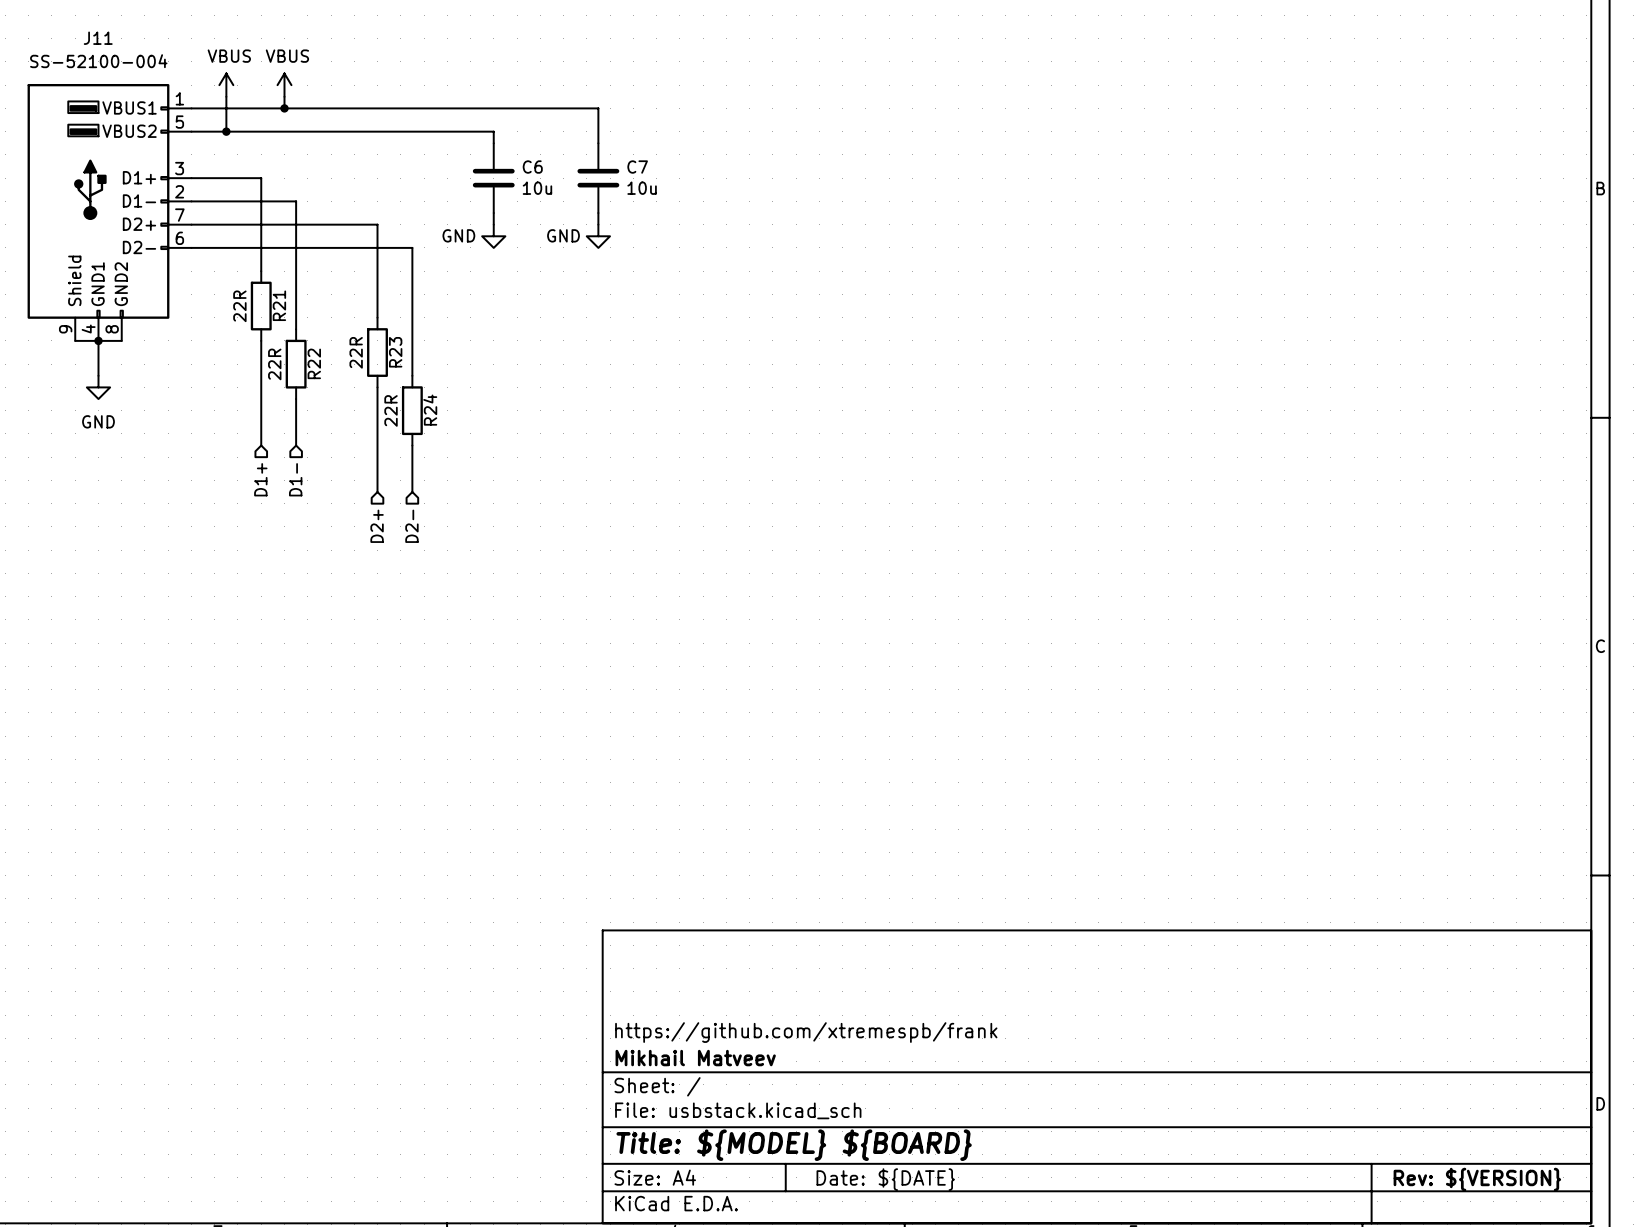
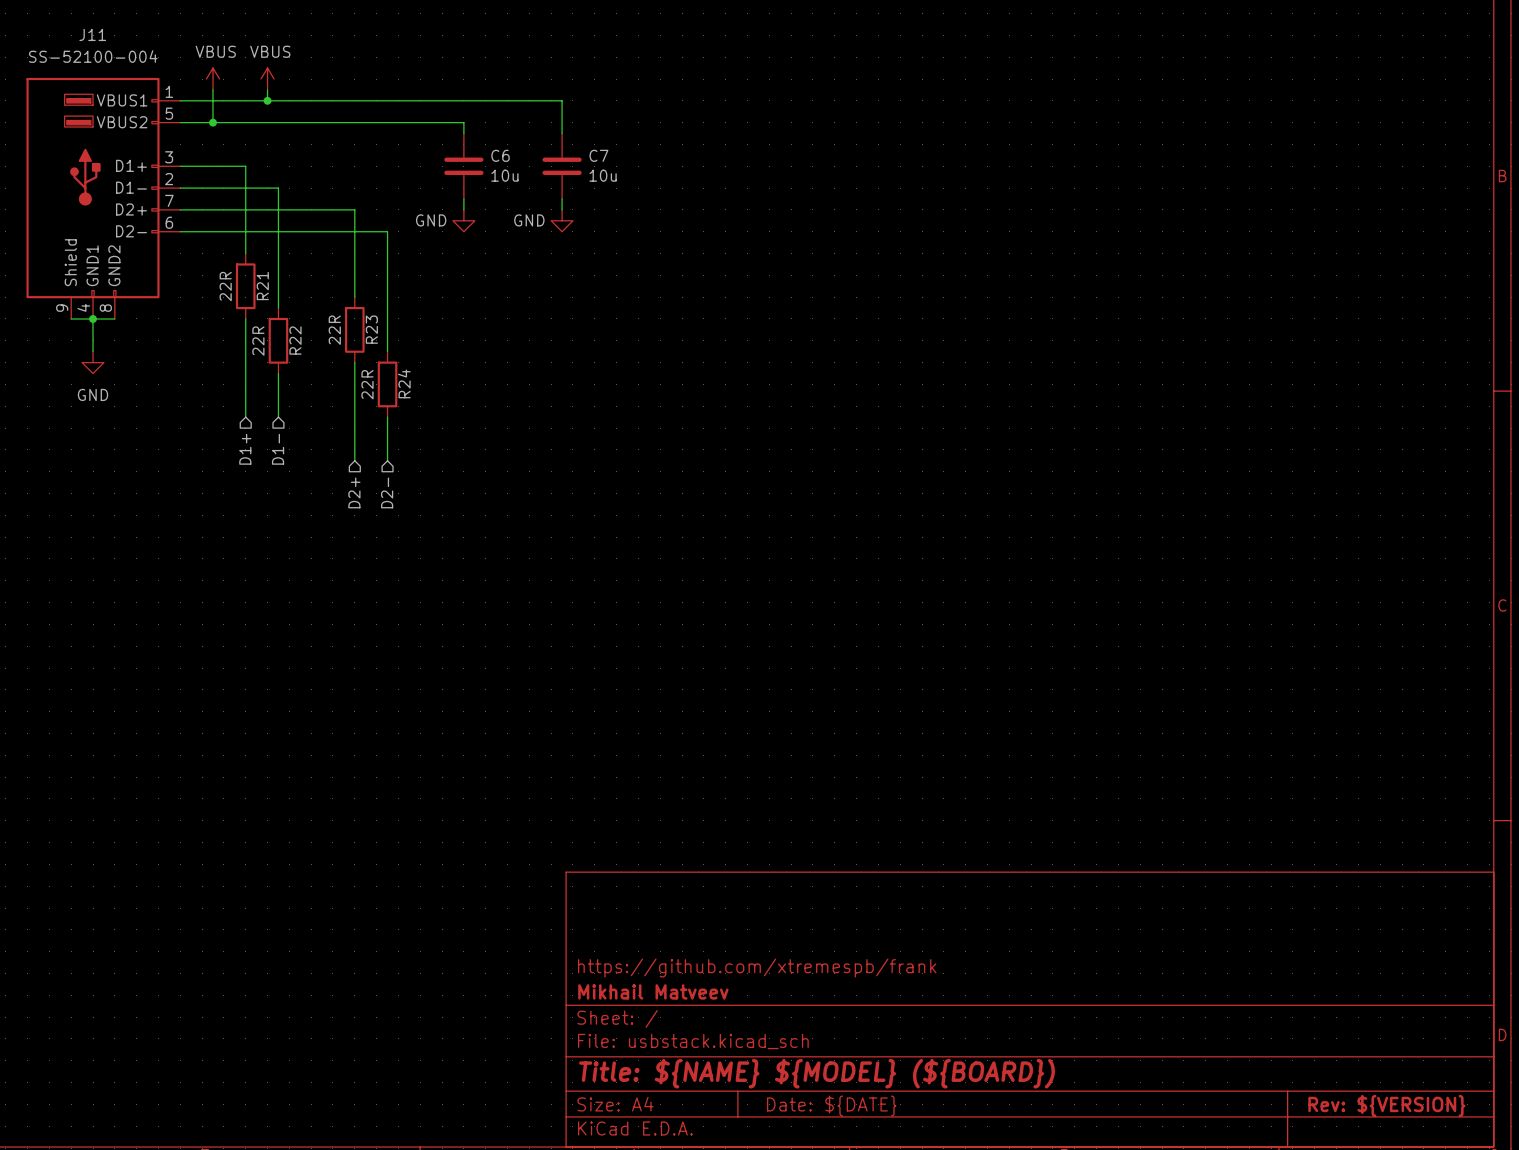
title block: Title: ${MODEL} ${BOARD} (794, 1145) -> Title: ${NAME} ${MODEL} (${BOARD}) (817, 1073)

